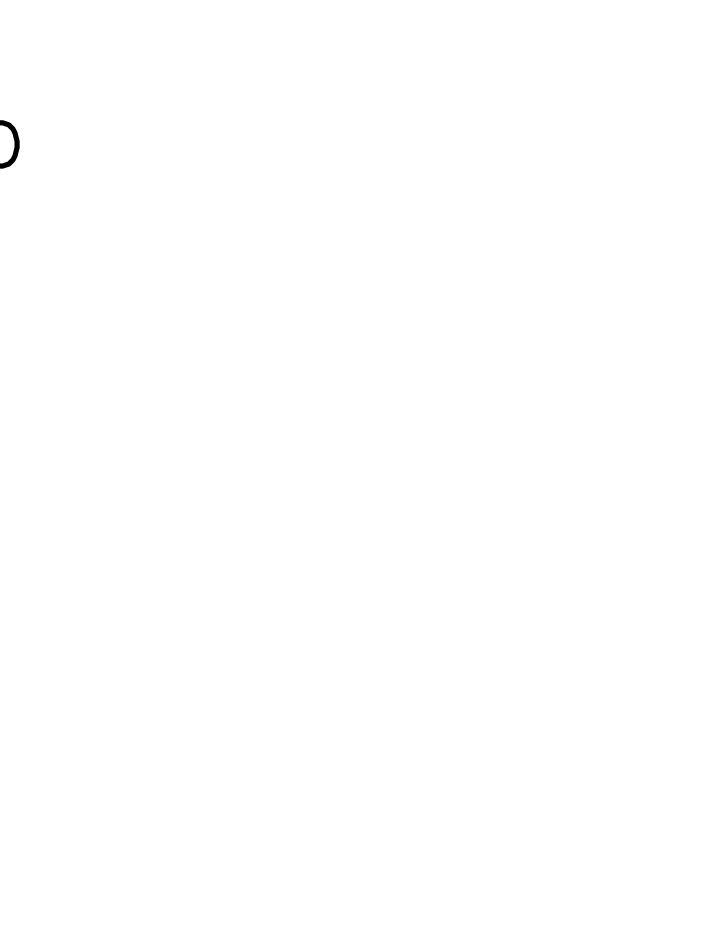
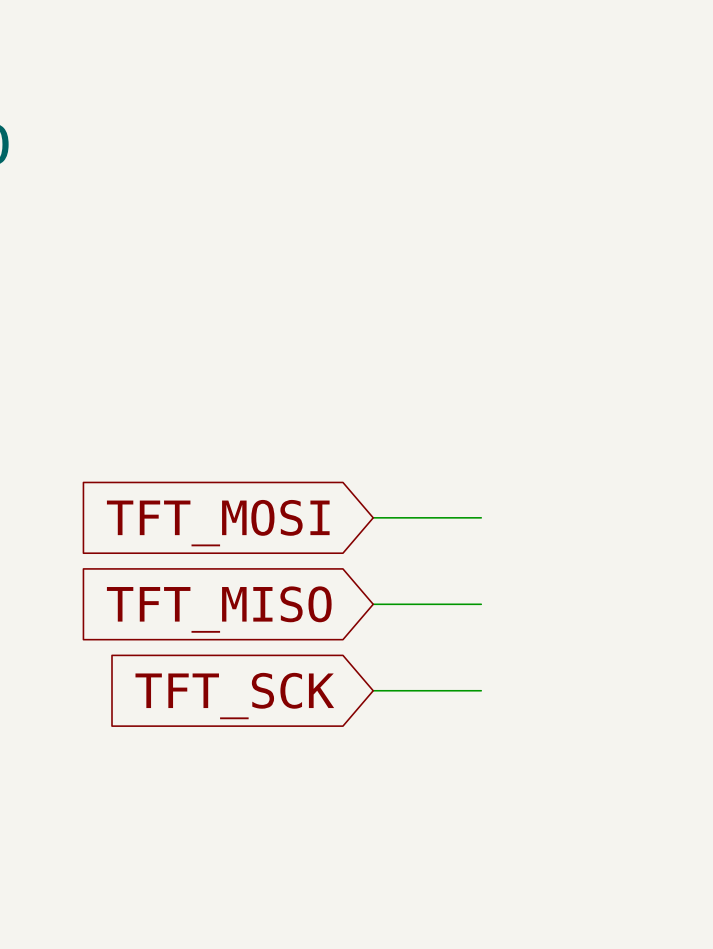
wire: none -> (373, 517) (481, 517)
global label: none -> TFT_MOSI (218, 523)
wire: none -> (373, 604) (481, 604)
global label: none -> TFT_MISO (219, 609)
wire: none -> (373, 690) (481, 690)
global label: none -> TFT_SCK (234, 696)

